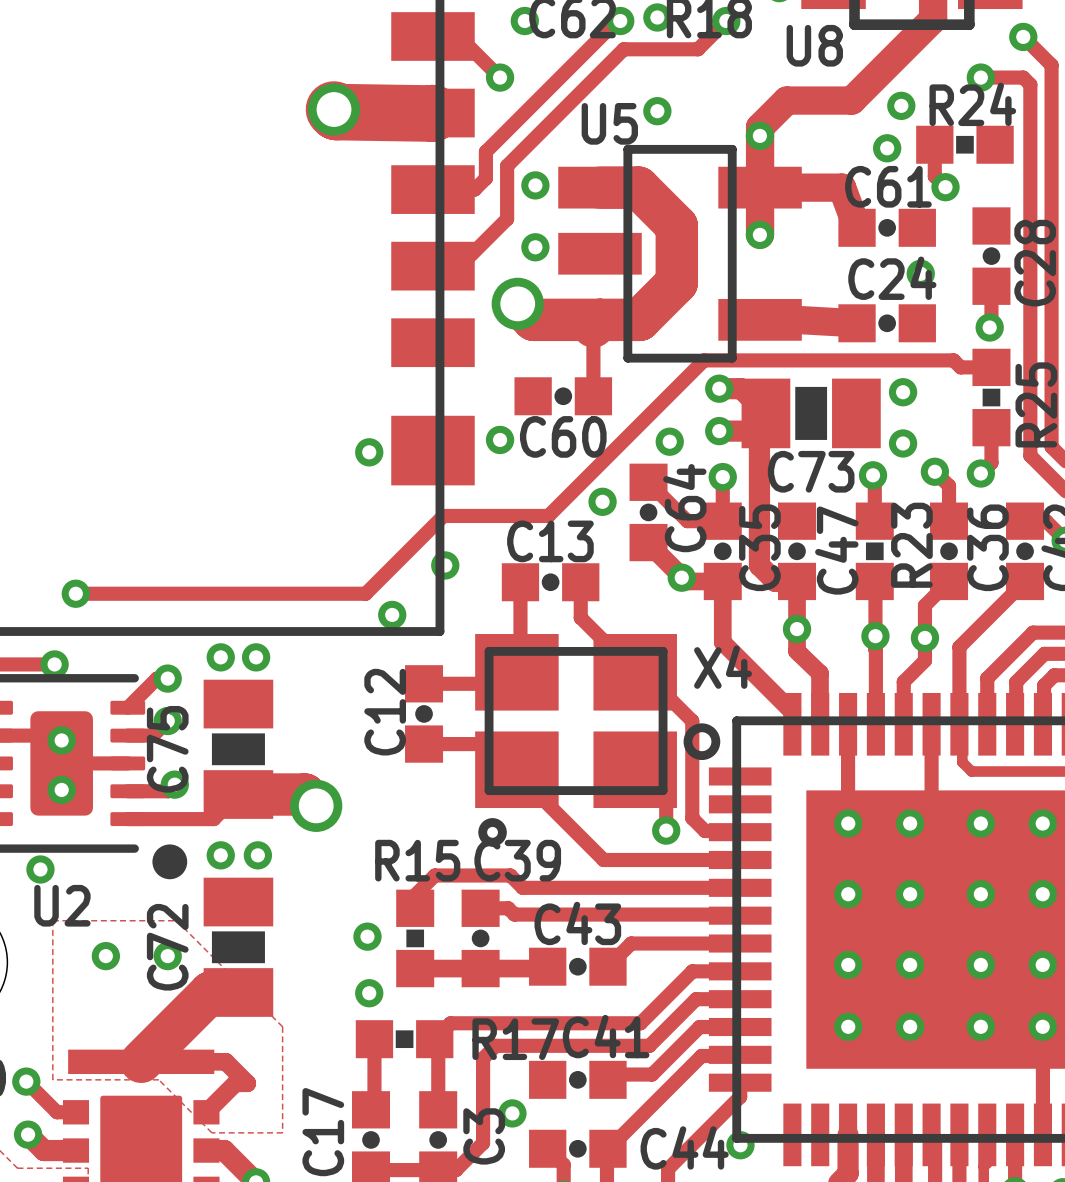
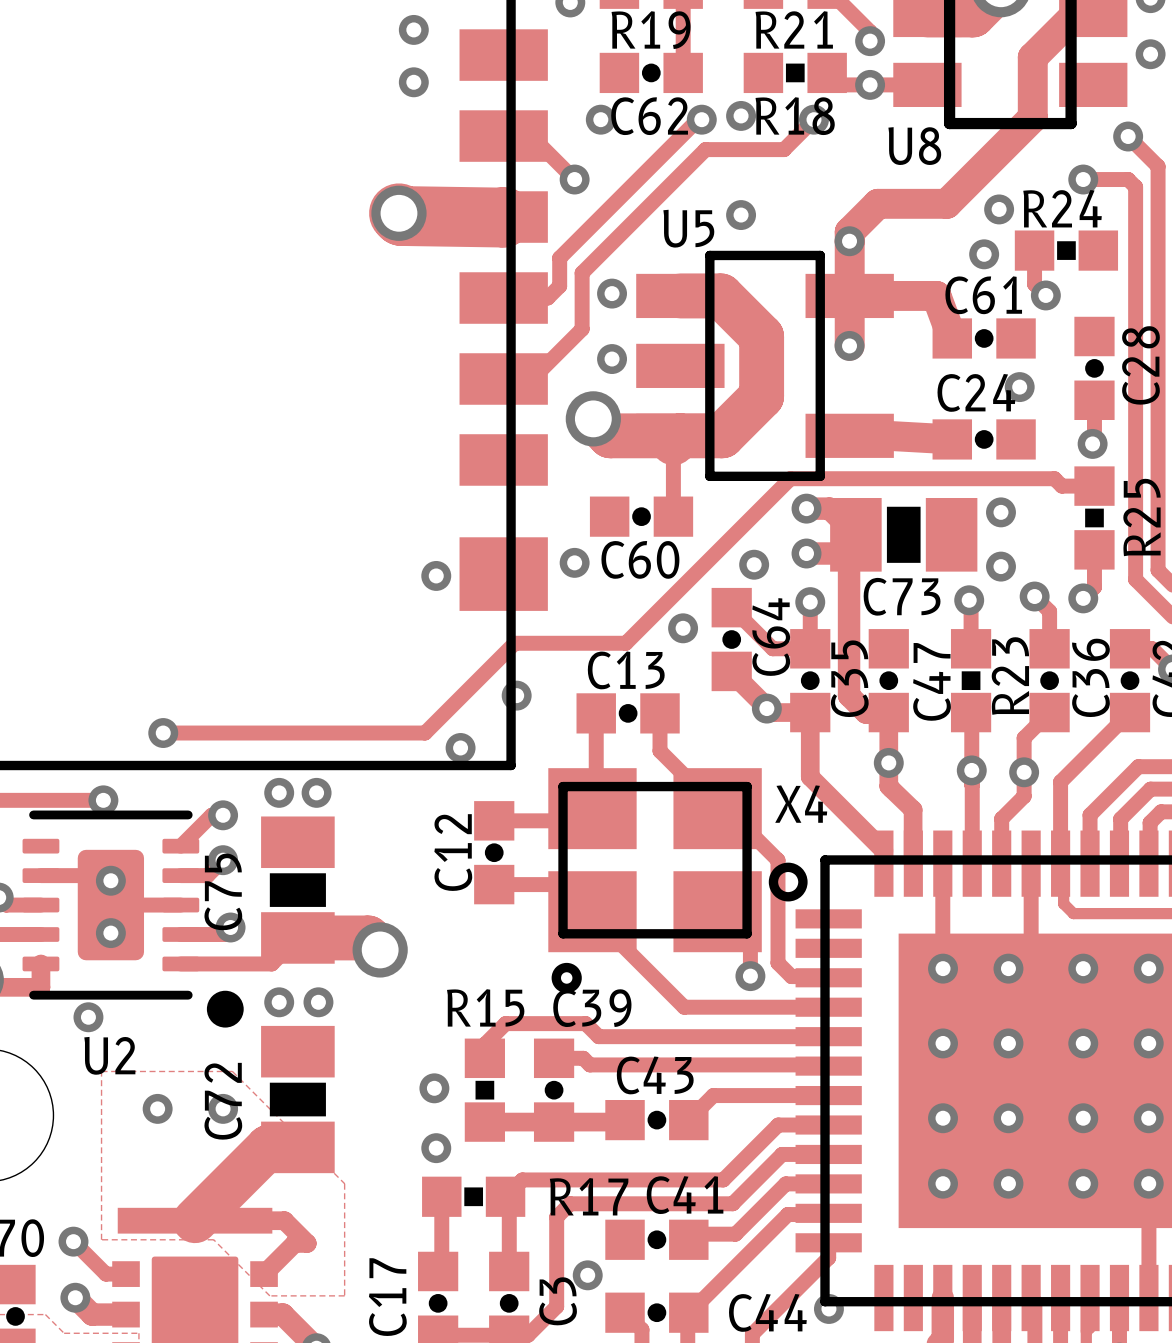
track: (75, 593) (365, 593) -> (163, 733) (425, 733) (432, 725)
via position: (75, 593) -> (163, 733)

